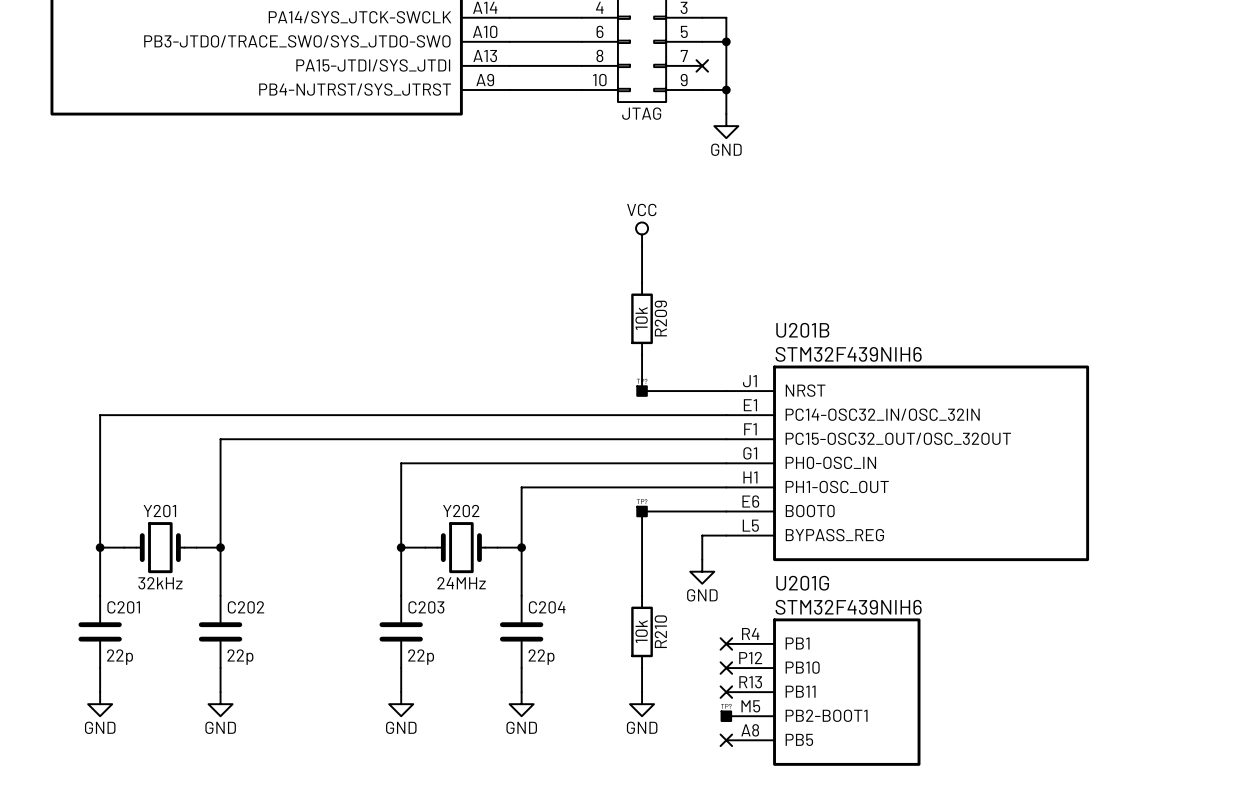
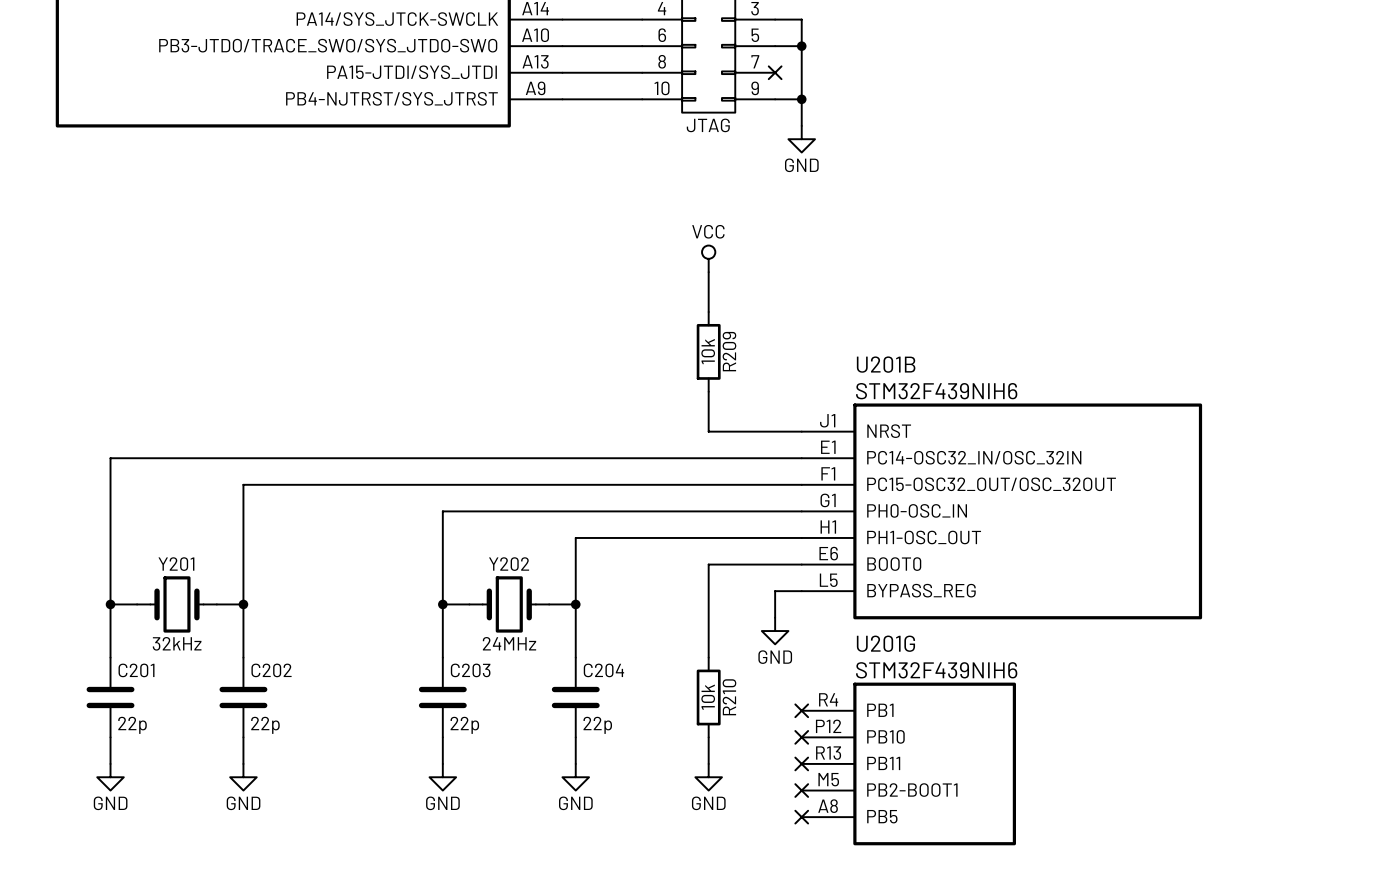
part: (642, 391) -> none
part: (642, 511) -> none
part: (726, 716) -> none
no-connect mark: none -> (801, 790)

